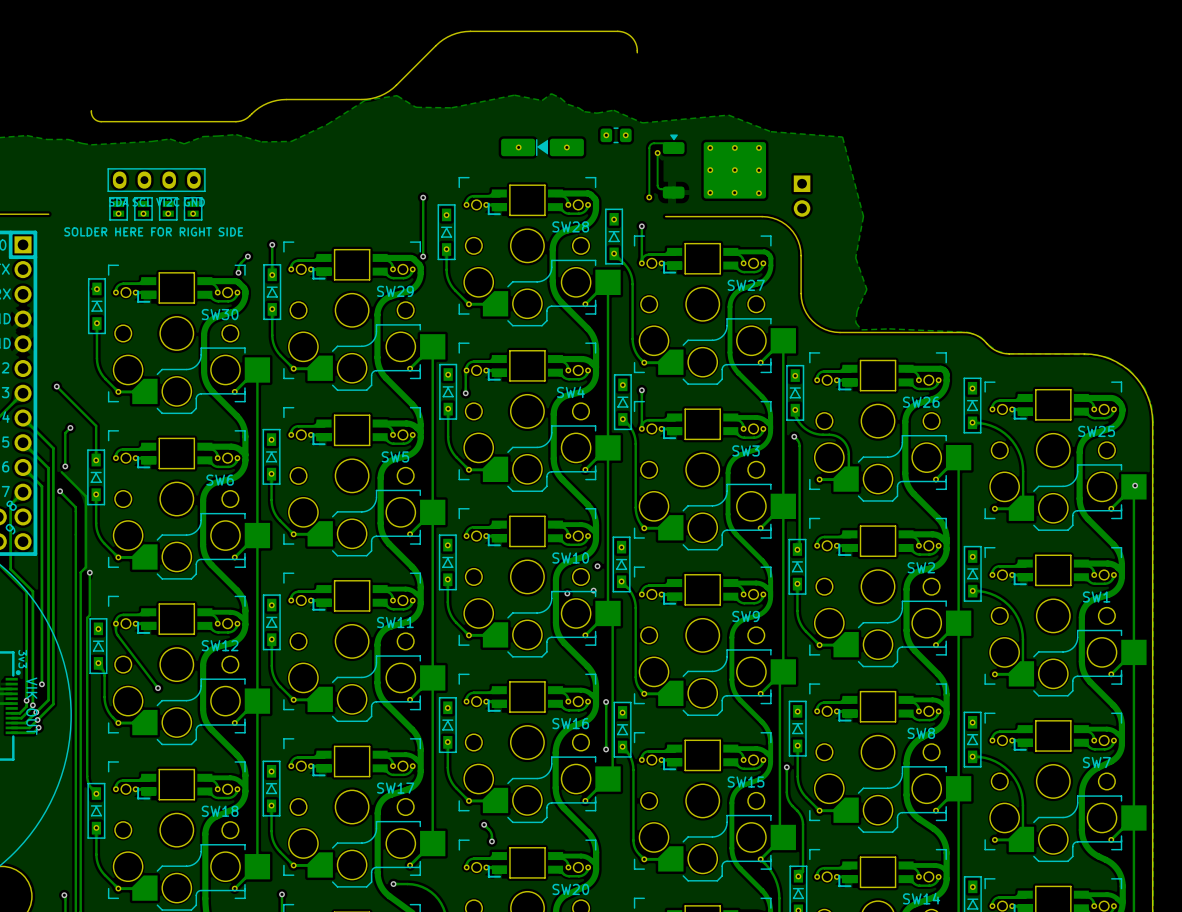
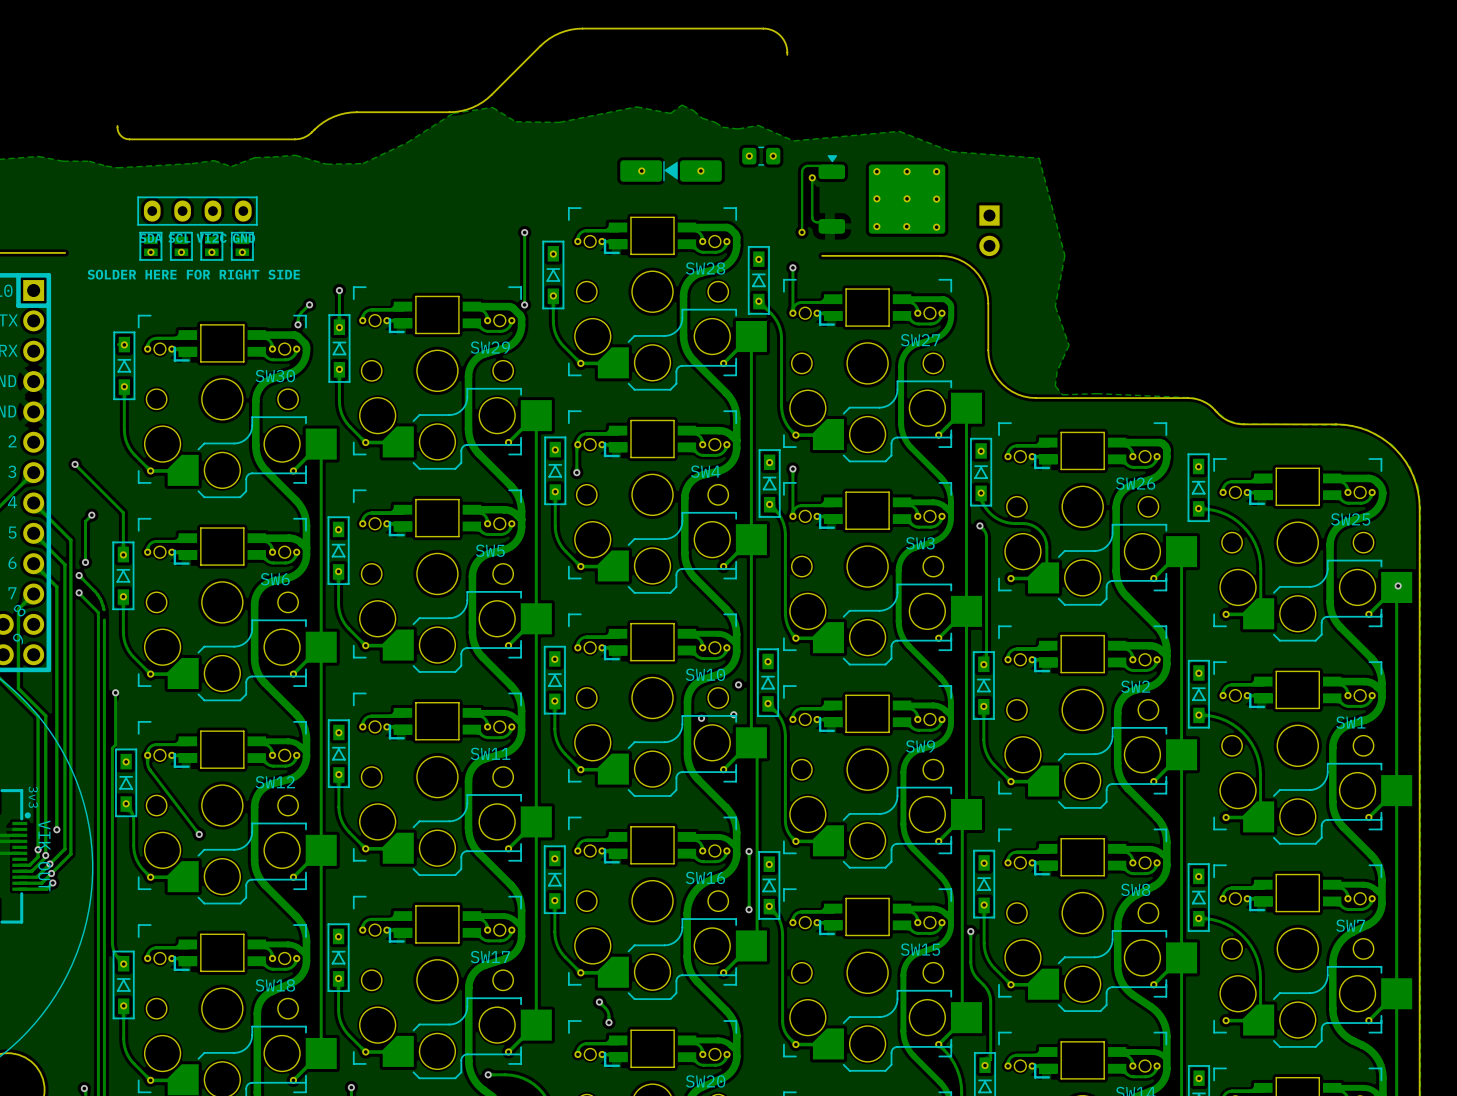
track: (61, 472) (86, 496) (86, 567) (80, 572) -> (104, 619) (104, 692)
track: none -> (79, 575) (97, 594) (104, 609)
via: none -> (79, 575)

